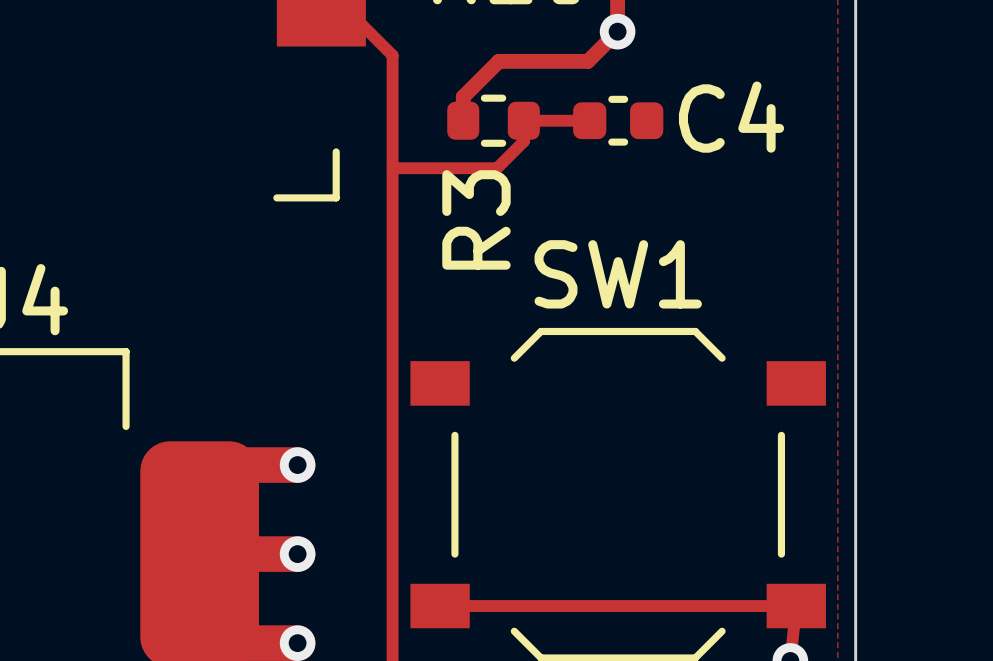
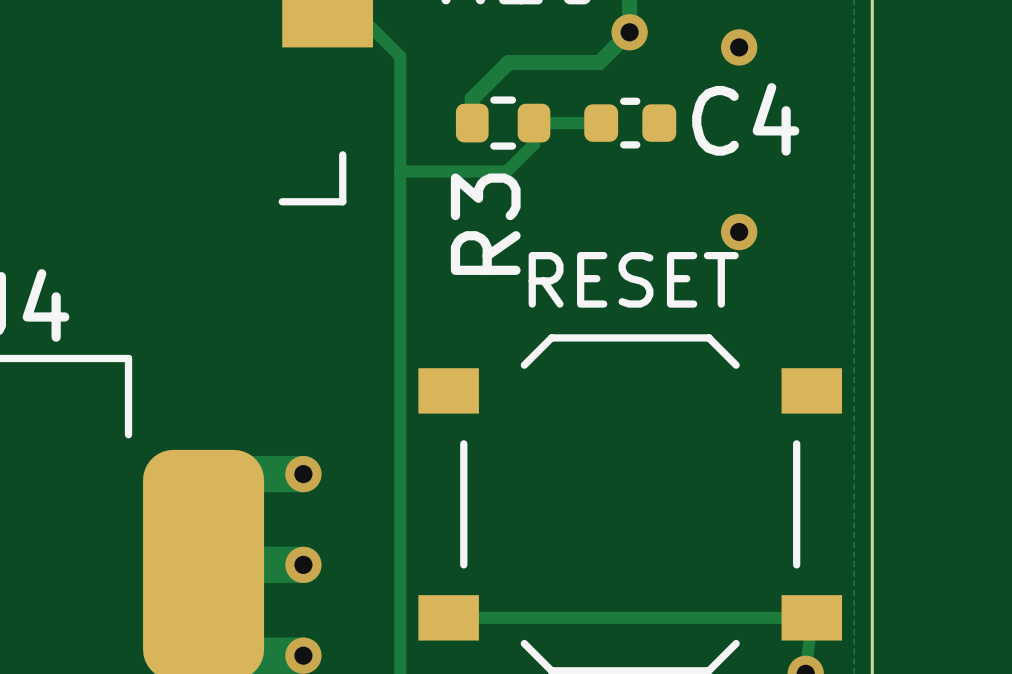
via: none -> (739, 47)
via: none -> (739, 232)
SW1 name: SW1 (618, 274) -> none
text: none -> RESET (633, 279)

